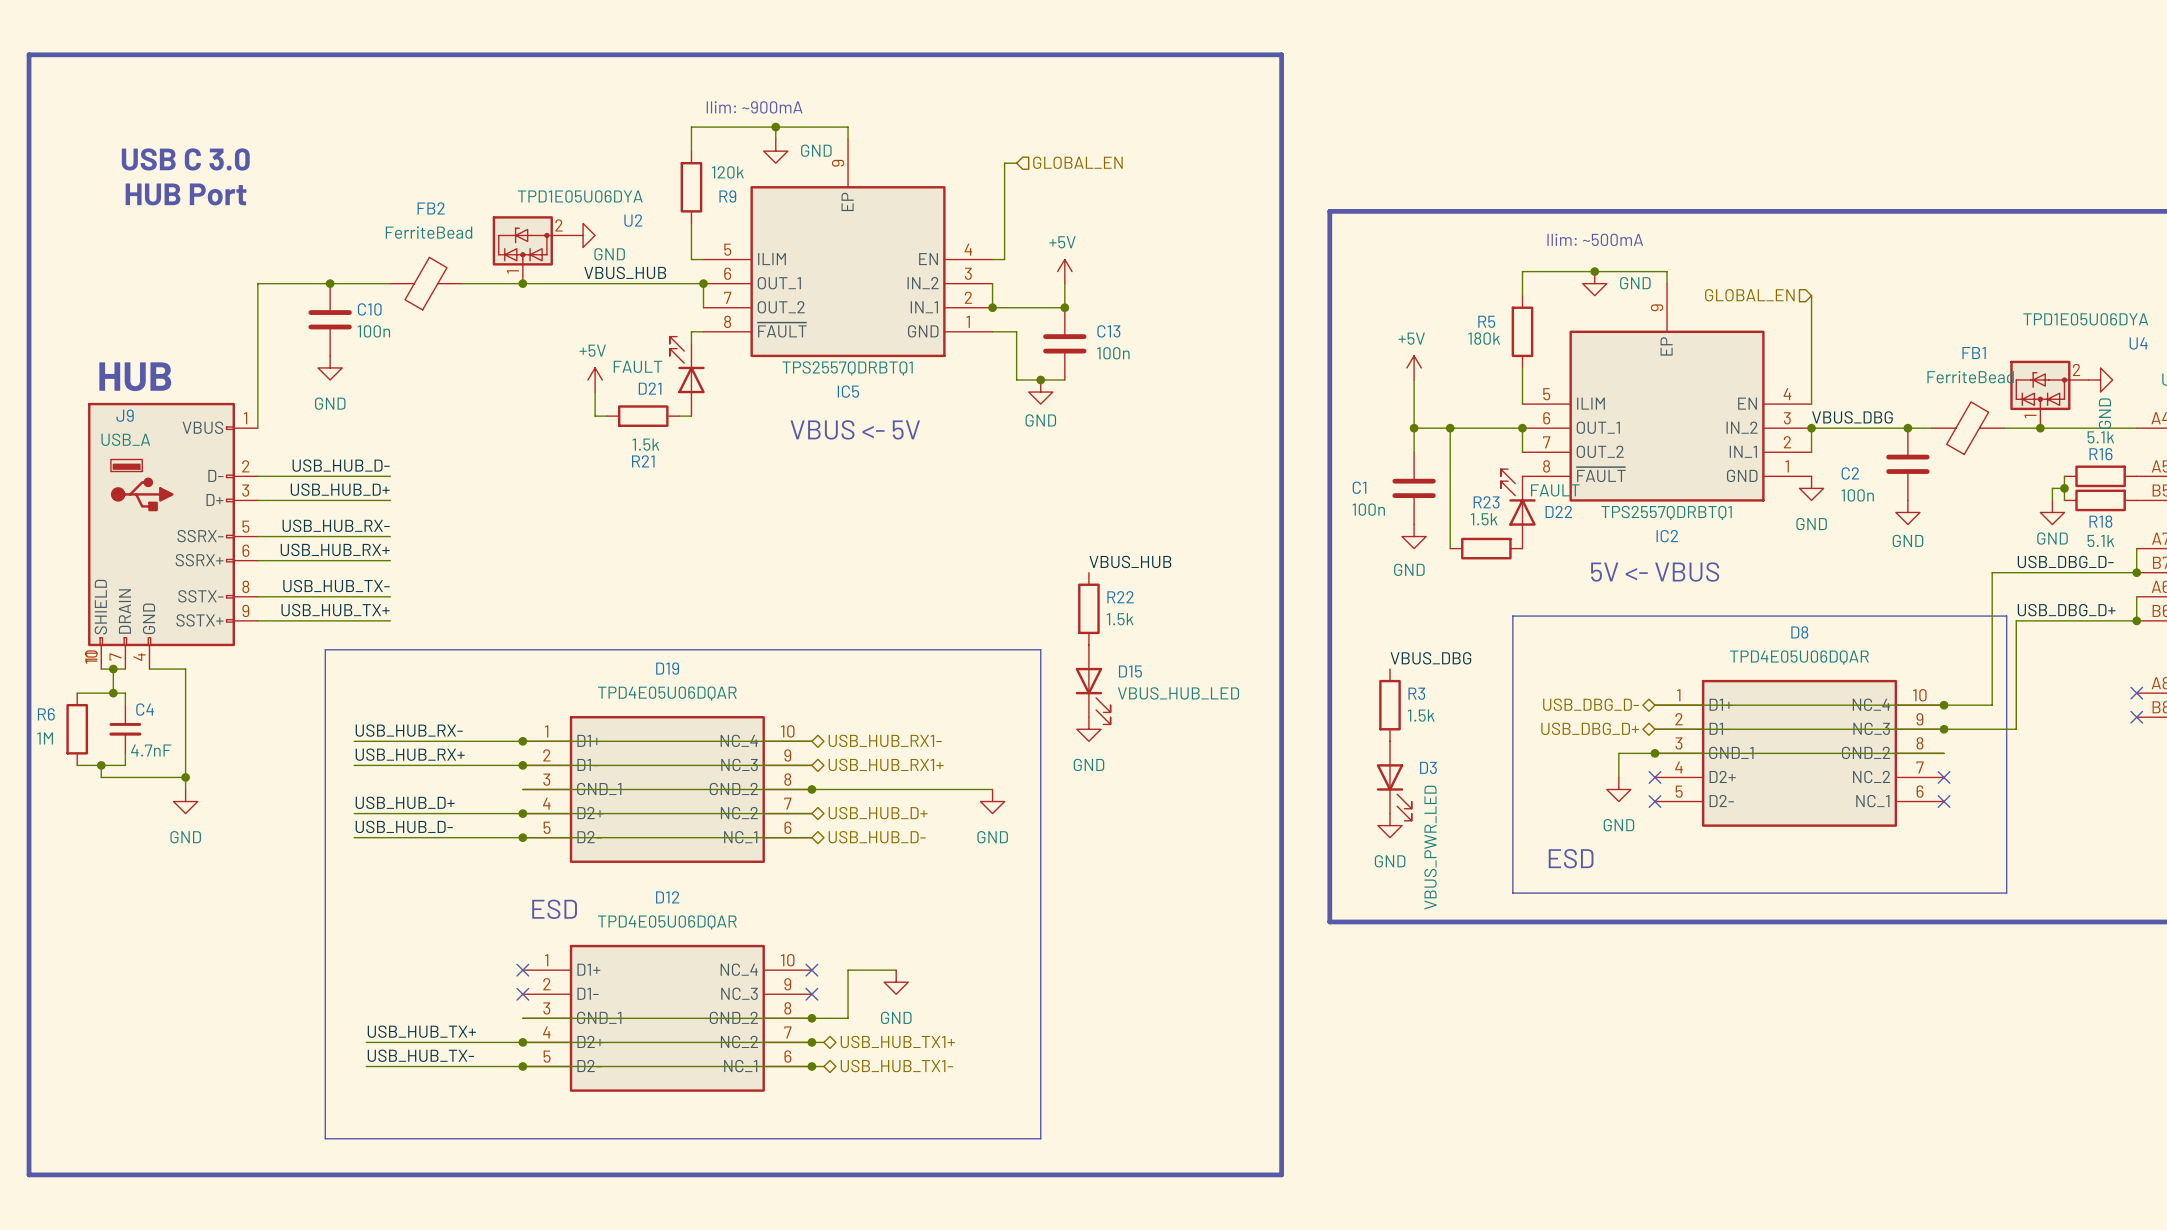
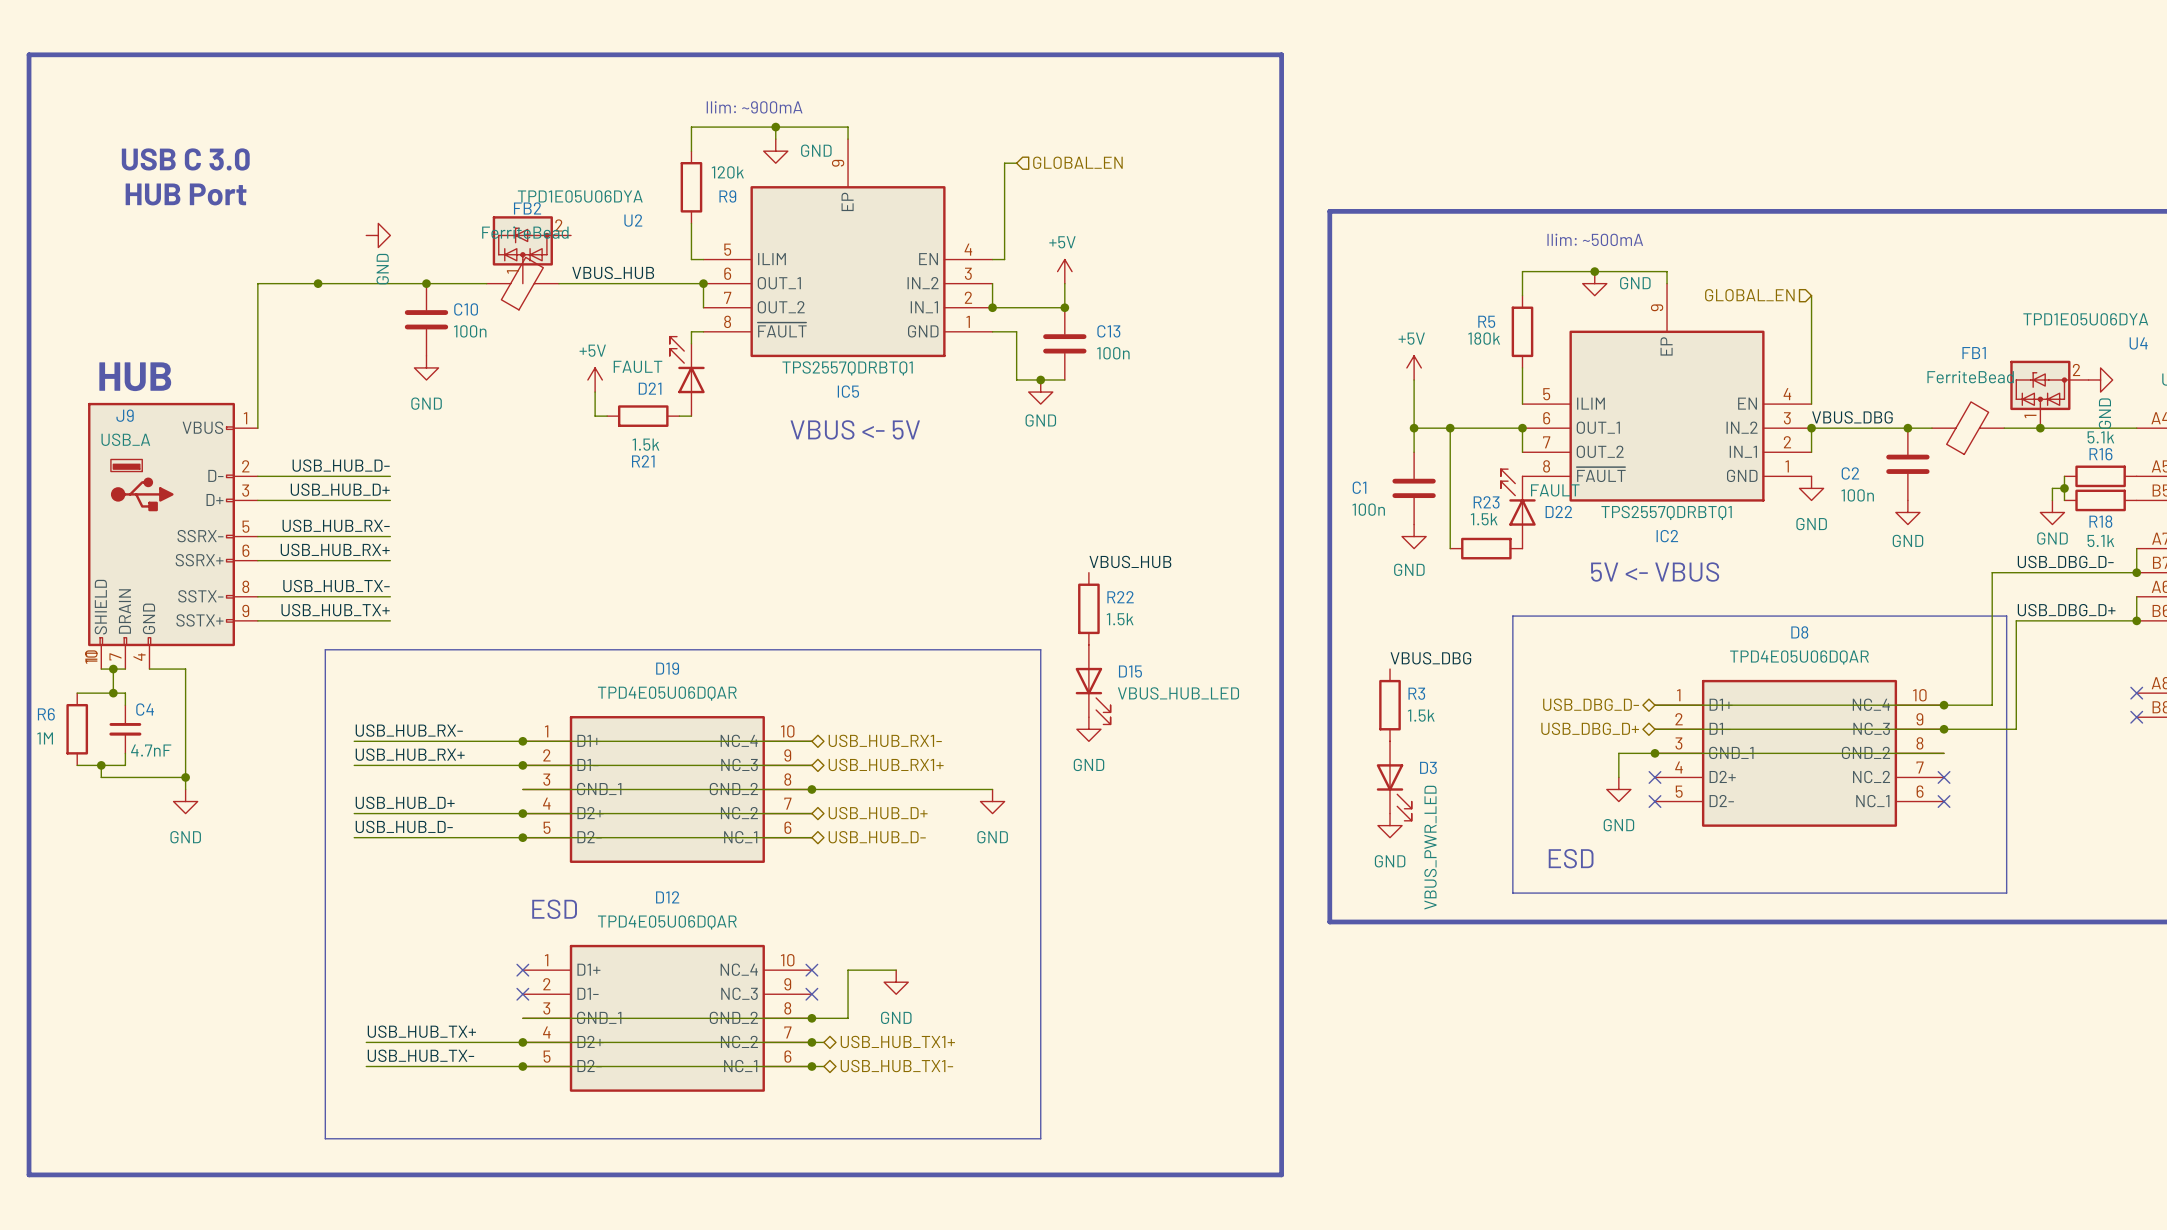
power symbol: none -> GND (378, 235)
power symbol: GND (583, 235) -> none
label position: VBUS_HUB (625, 272) -> VBUS_HUB (613, 272)
junction position: (330, 283) -> (318, 283)
junction: none -> (426, 283)
FB2 position: (426, 283) -> (522, 283)
junction: (522, 283) -> none
C10 position: (330, 319) -> (426, 319)
power symbol: GND (330, 367) -> none
power symbol: none -> GND (426, 367)

